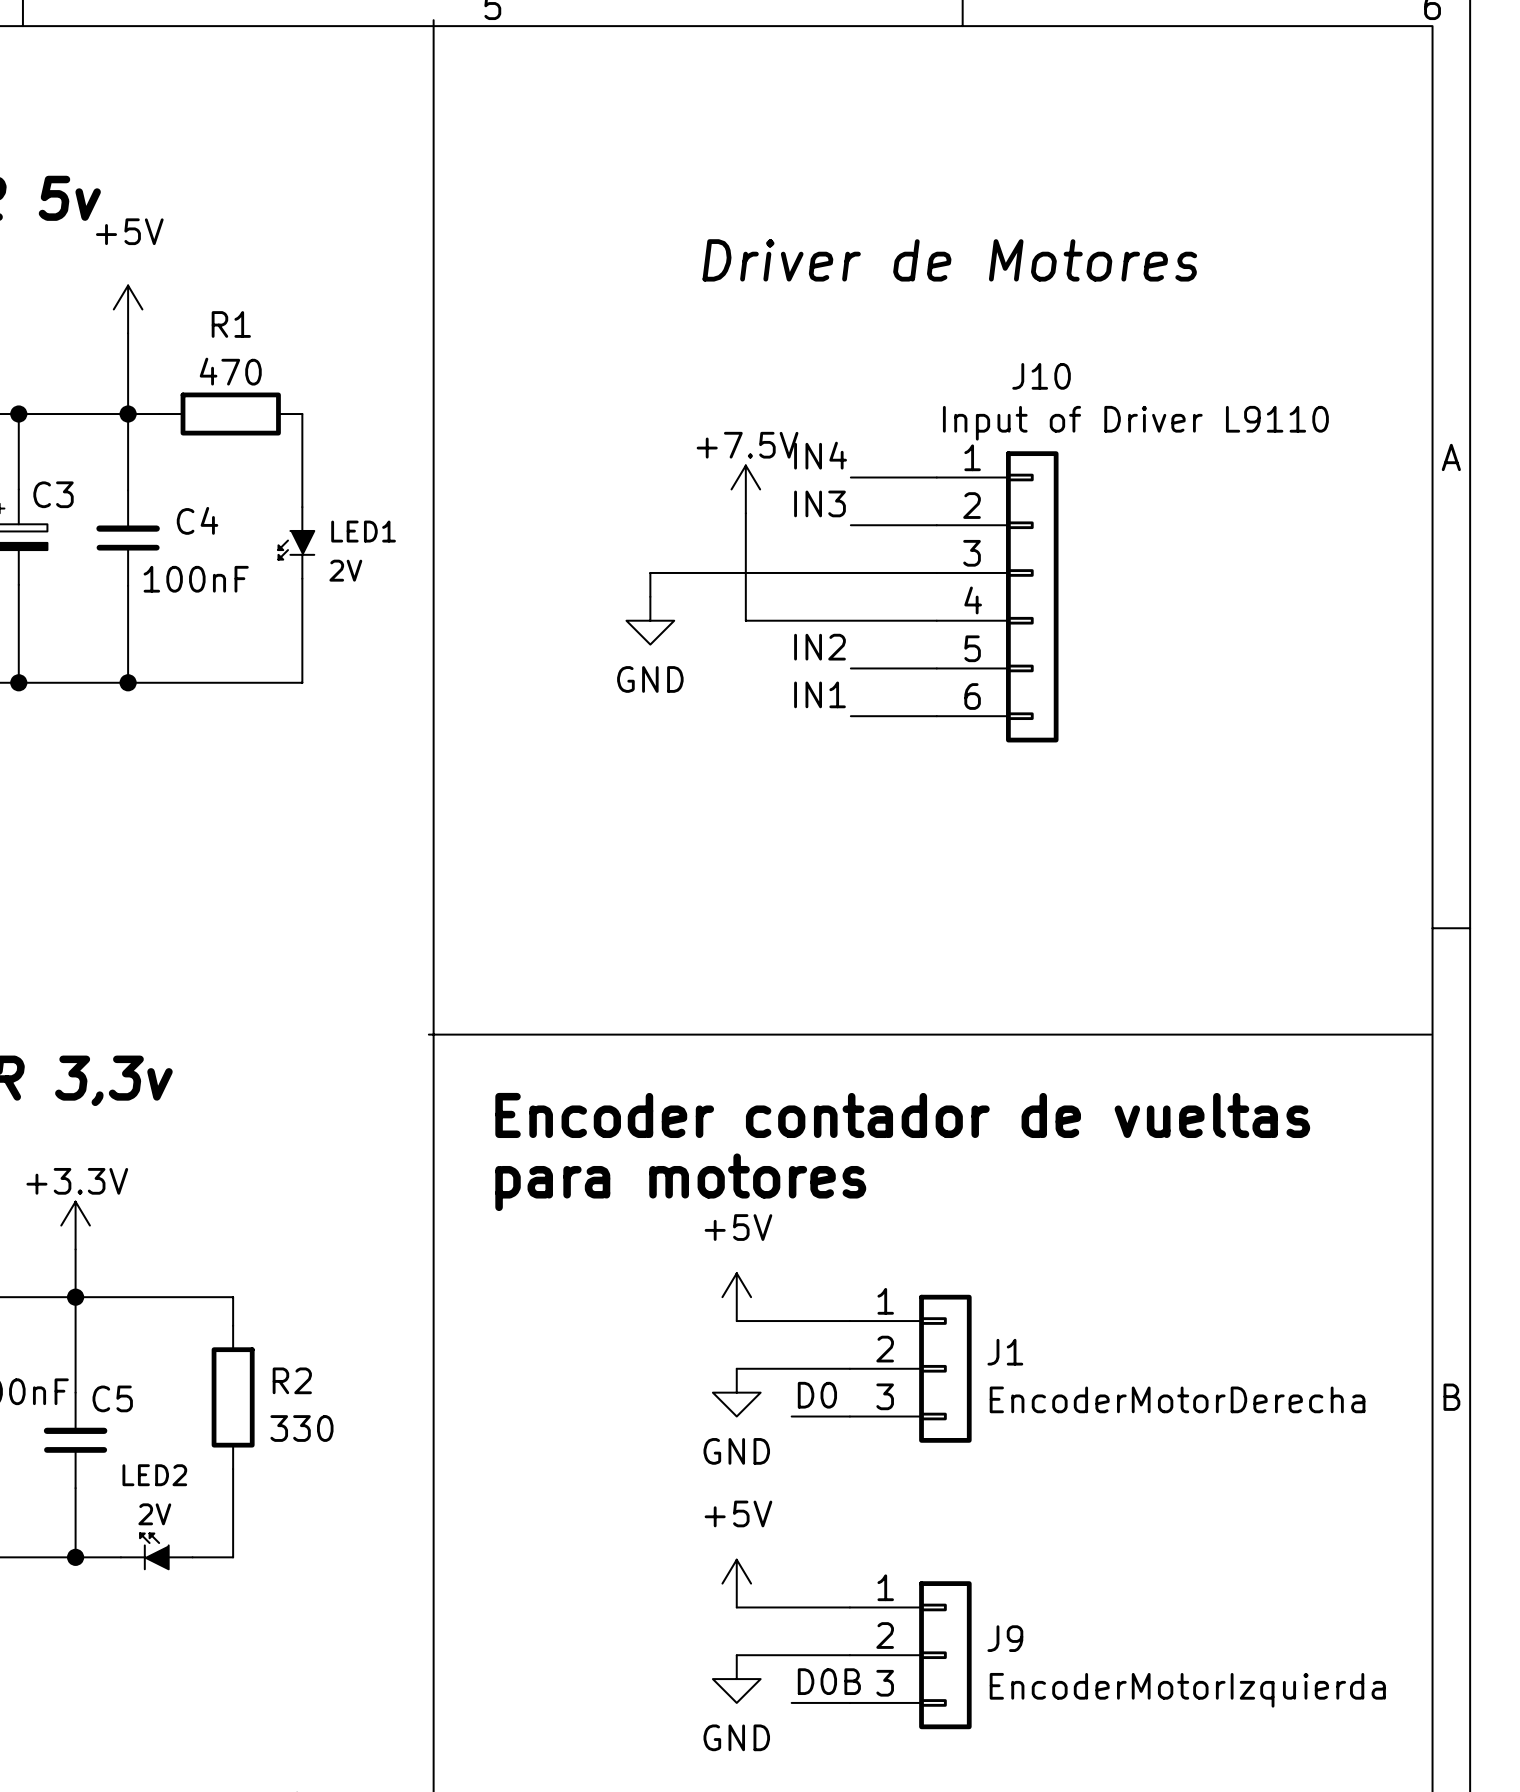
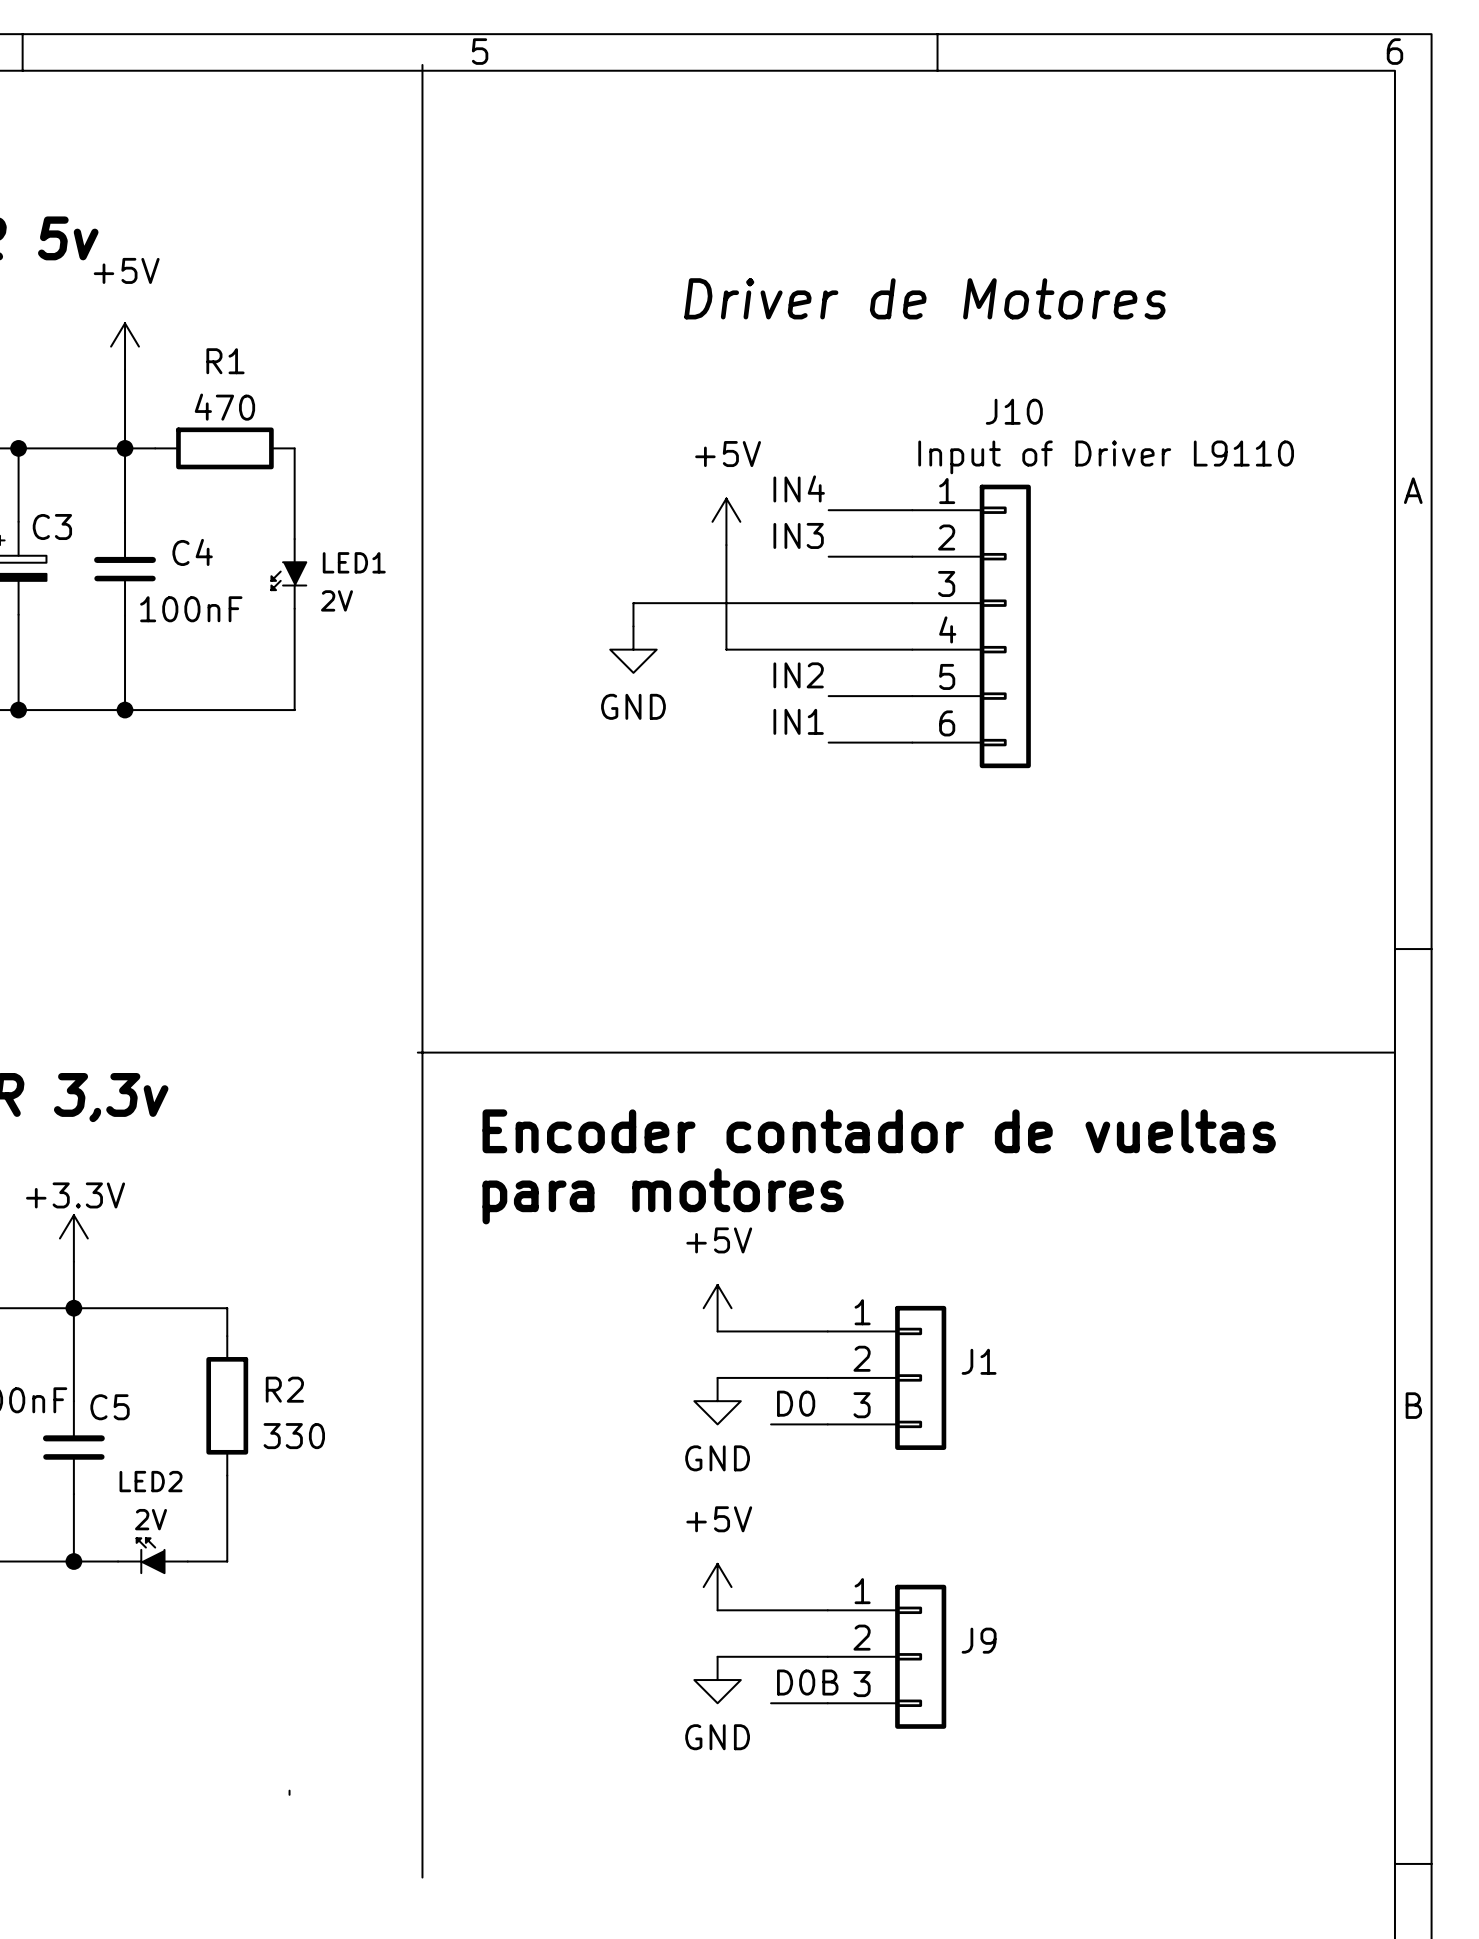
power symbol: +7.5V (745, 489) -> +5V (726, 521)
J1 value: EncoderMotorDerecha (1177, 1399) -> none
J9 value: EncoderMotorIzquierda (1187, 1690) -> none

